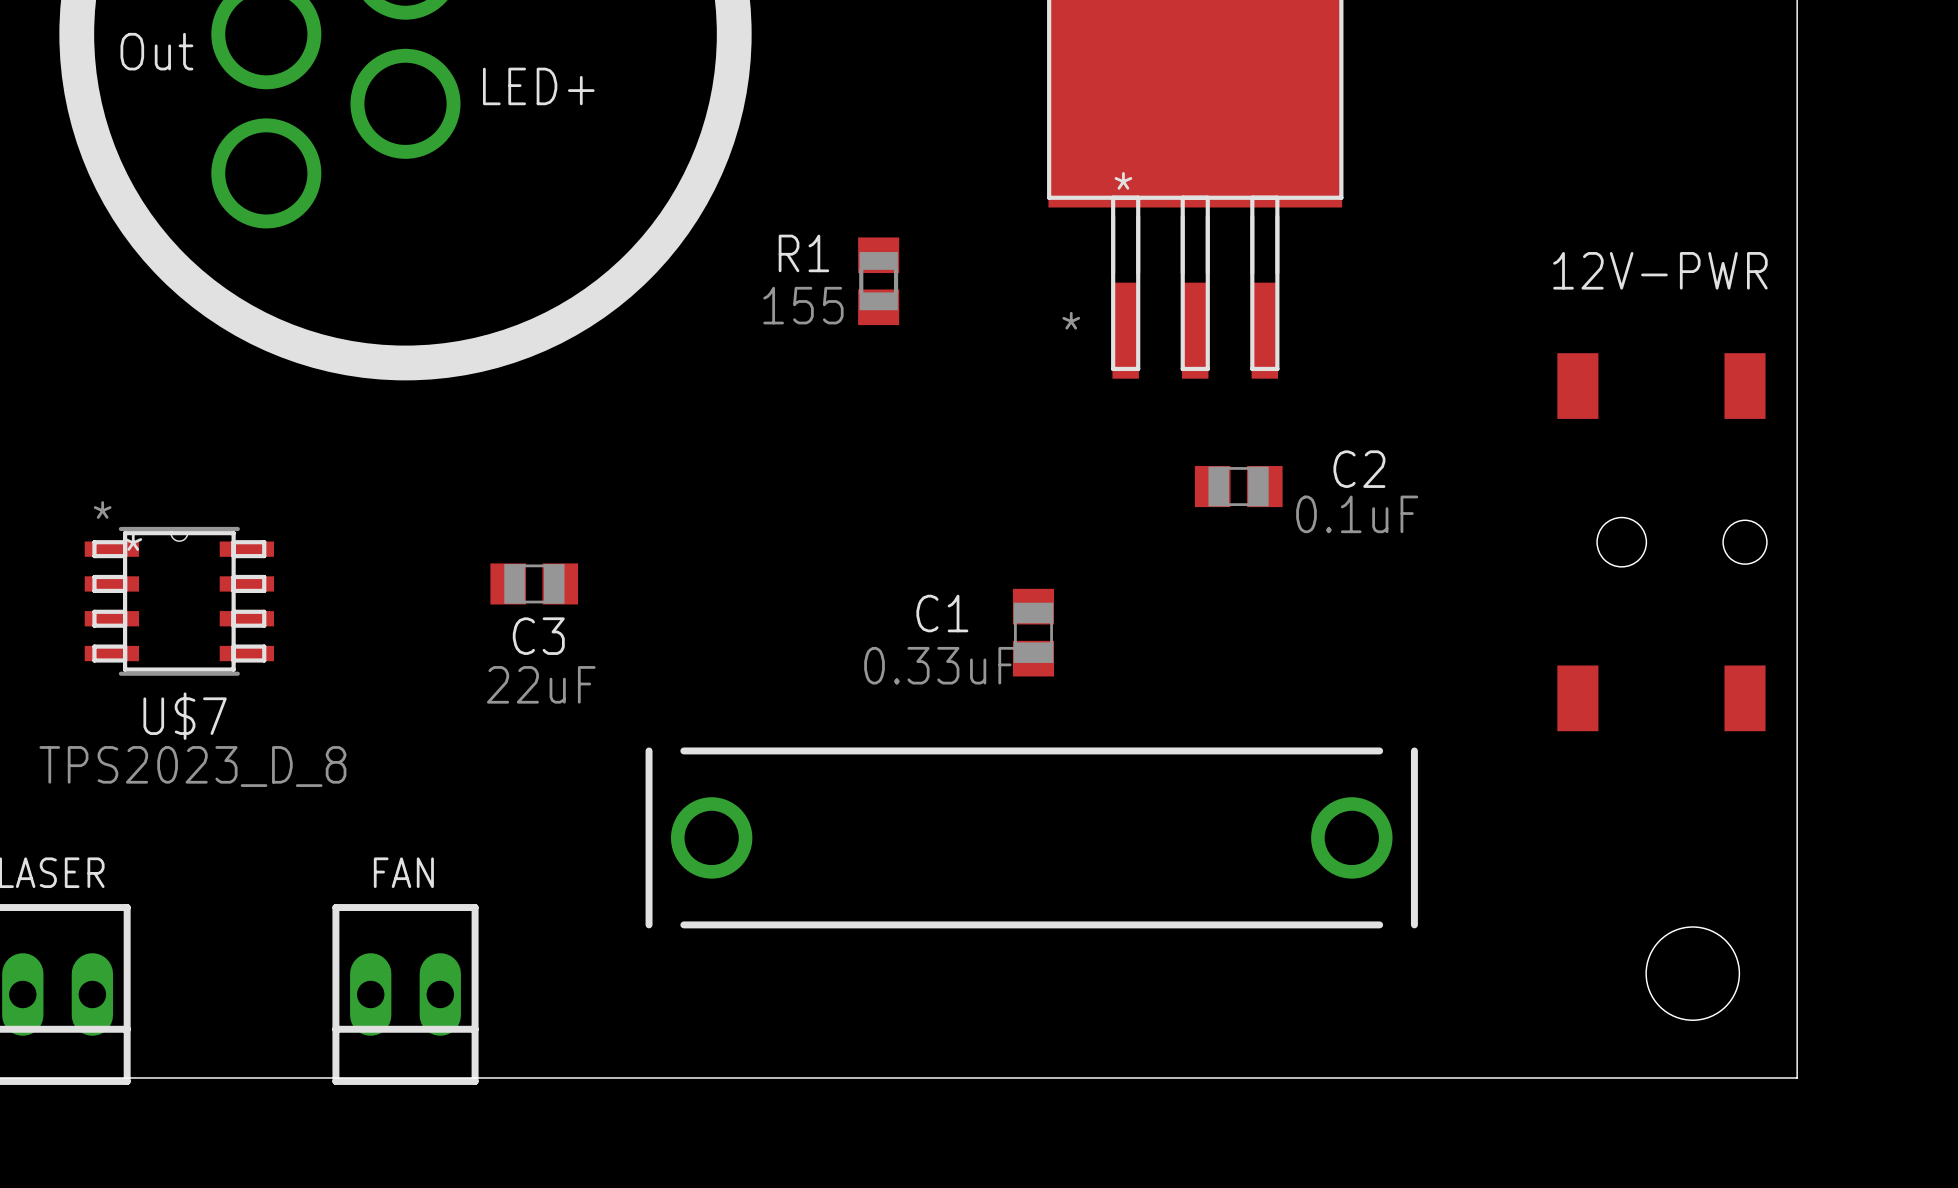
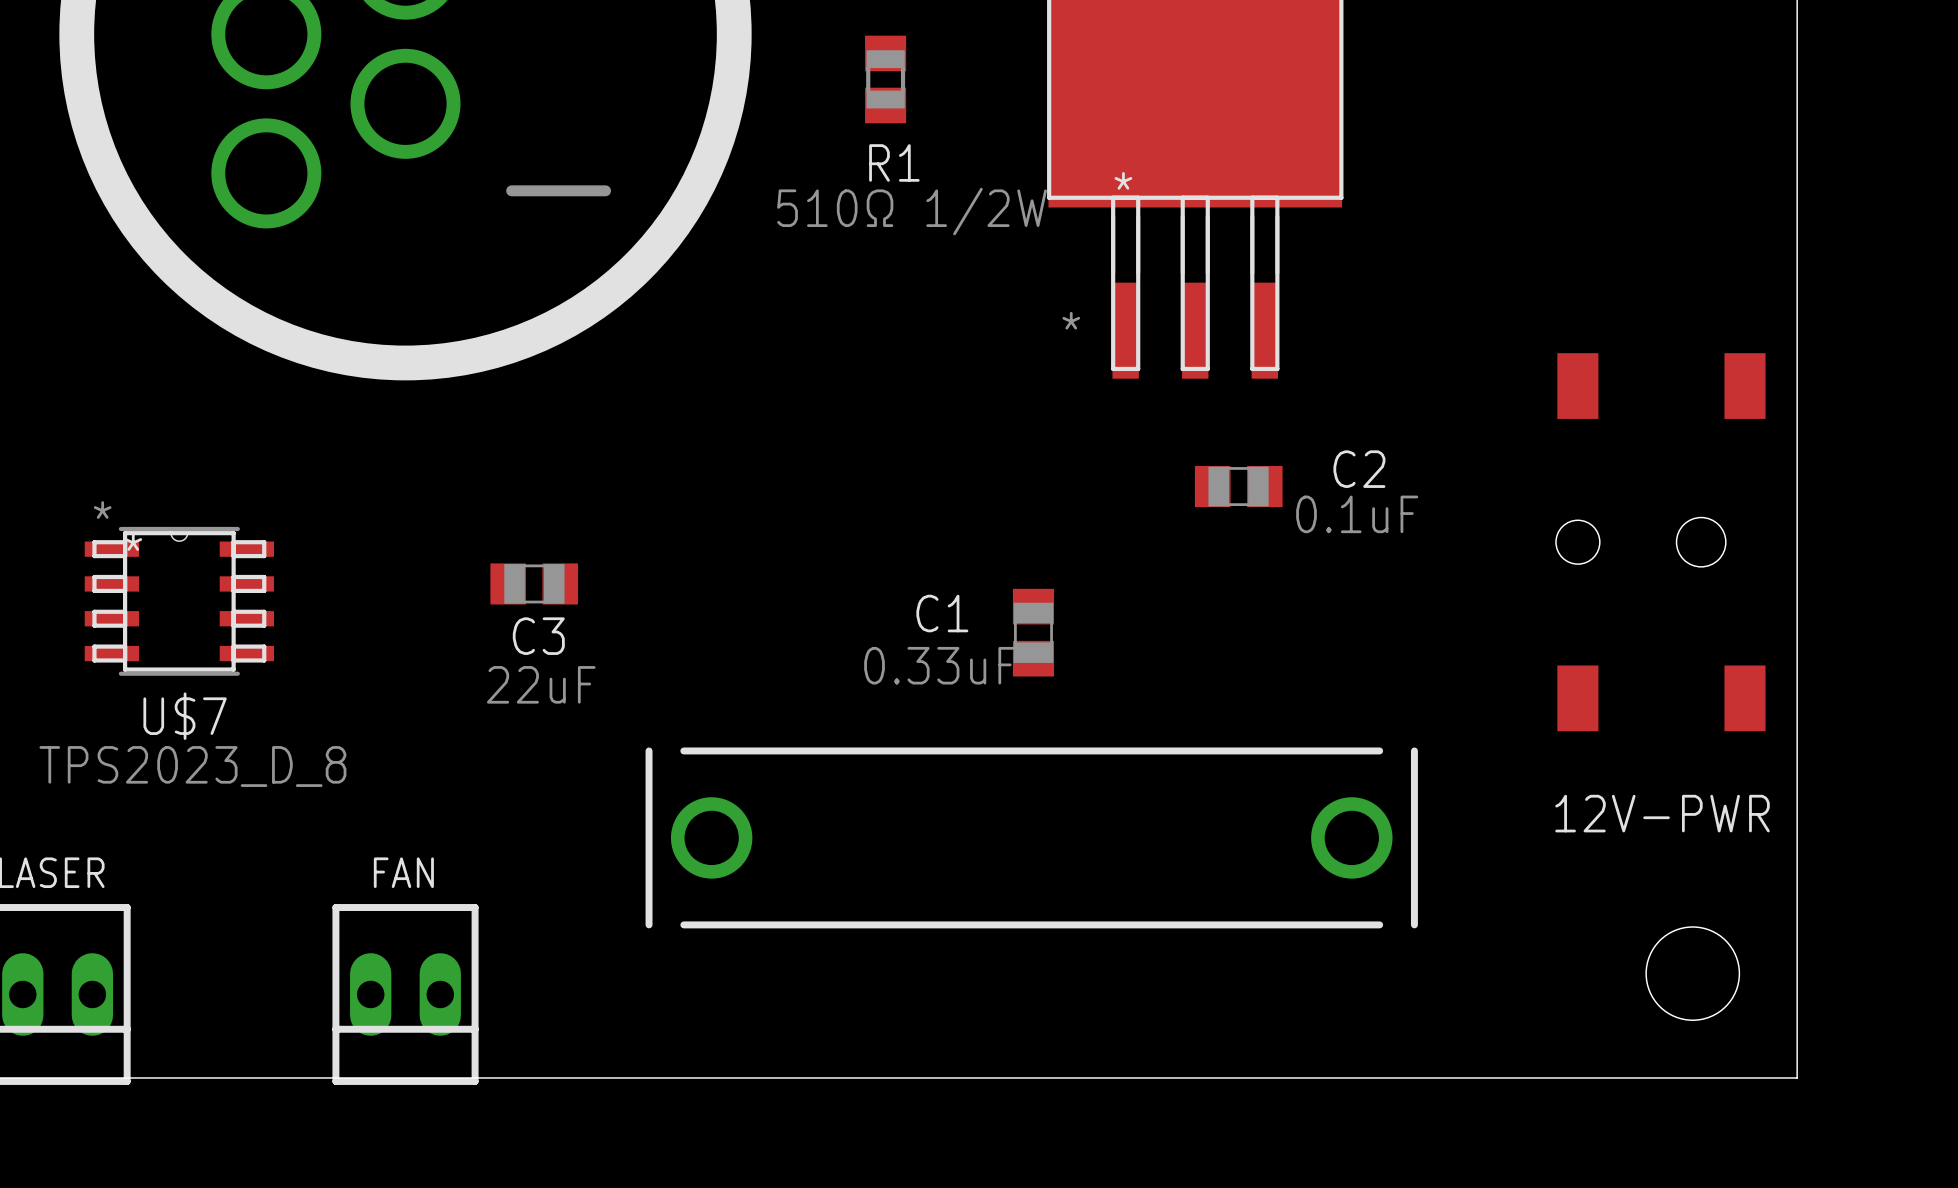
part text: Out (156, 51) -> none
part text: LED+ (538, 86) -> none
part text: none -> - (558, 190)
R1 name position: R1 (803, 253) -> R1 (894, 162)
R1 position: (878, 281) -> (885, 79)
R1 value: 155 (803, 305) -> 510Ω 1/2W (912, 211)
12V-PWR rotation: 0° (1662, 542) -> 180° (1660, 542)

